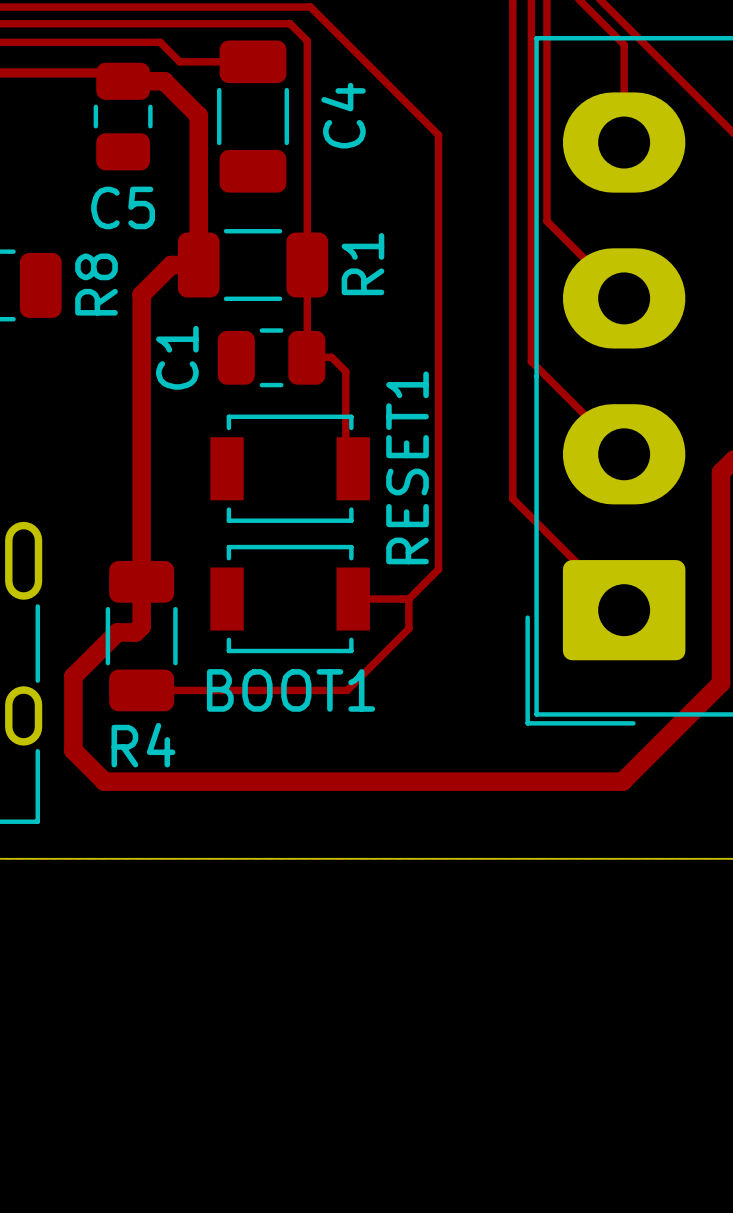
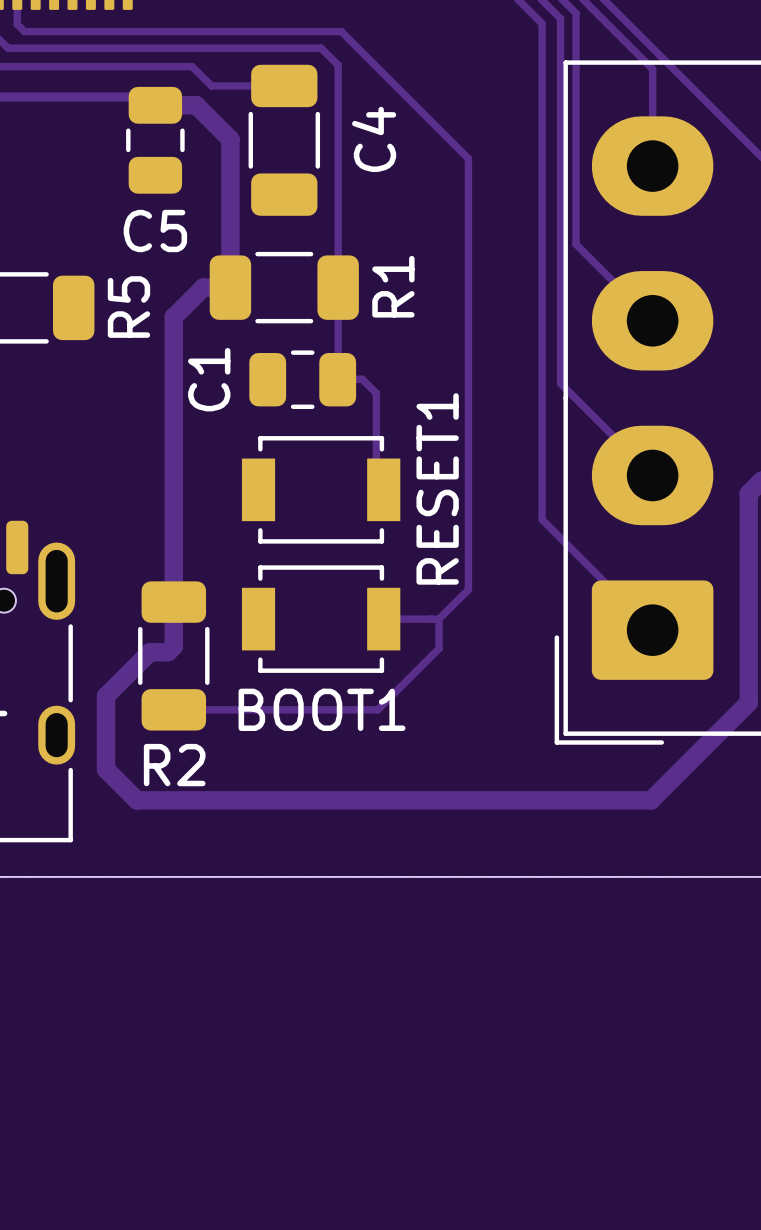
R8 name: R8 (96, 284) -> R5 (128, 307)
R4 name: R4 (143, 745) -> R2 (174, 765)

